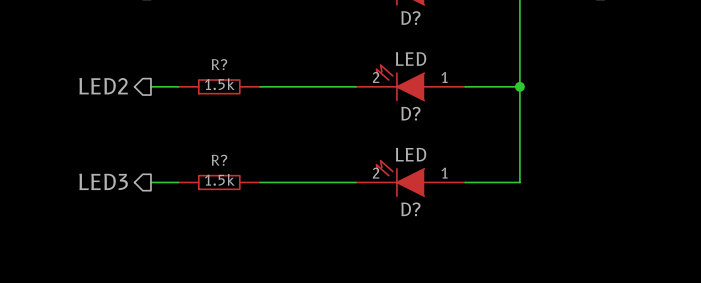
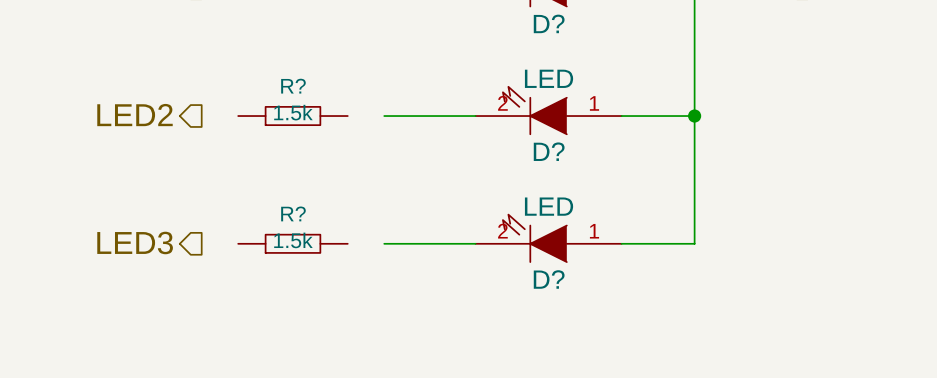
wire: (150, 86) (178, 86) -> none
wire: (260, 86) (287, 86) -> none
wire: (150, 182) (178, 182) -> none
wire: (260, 182) (287, 182) -> none

